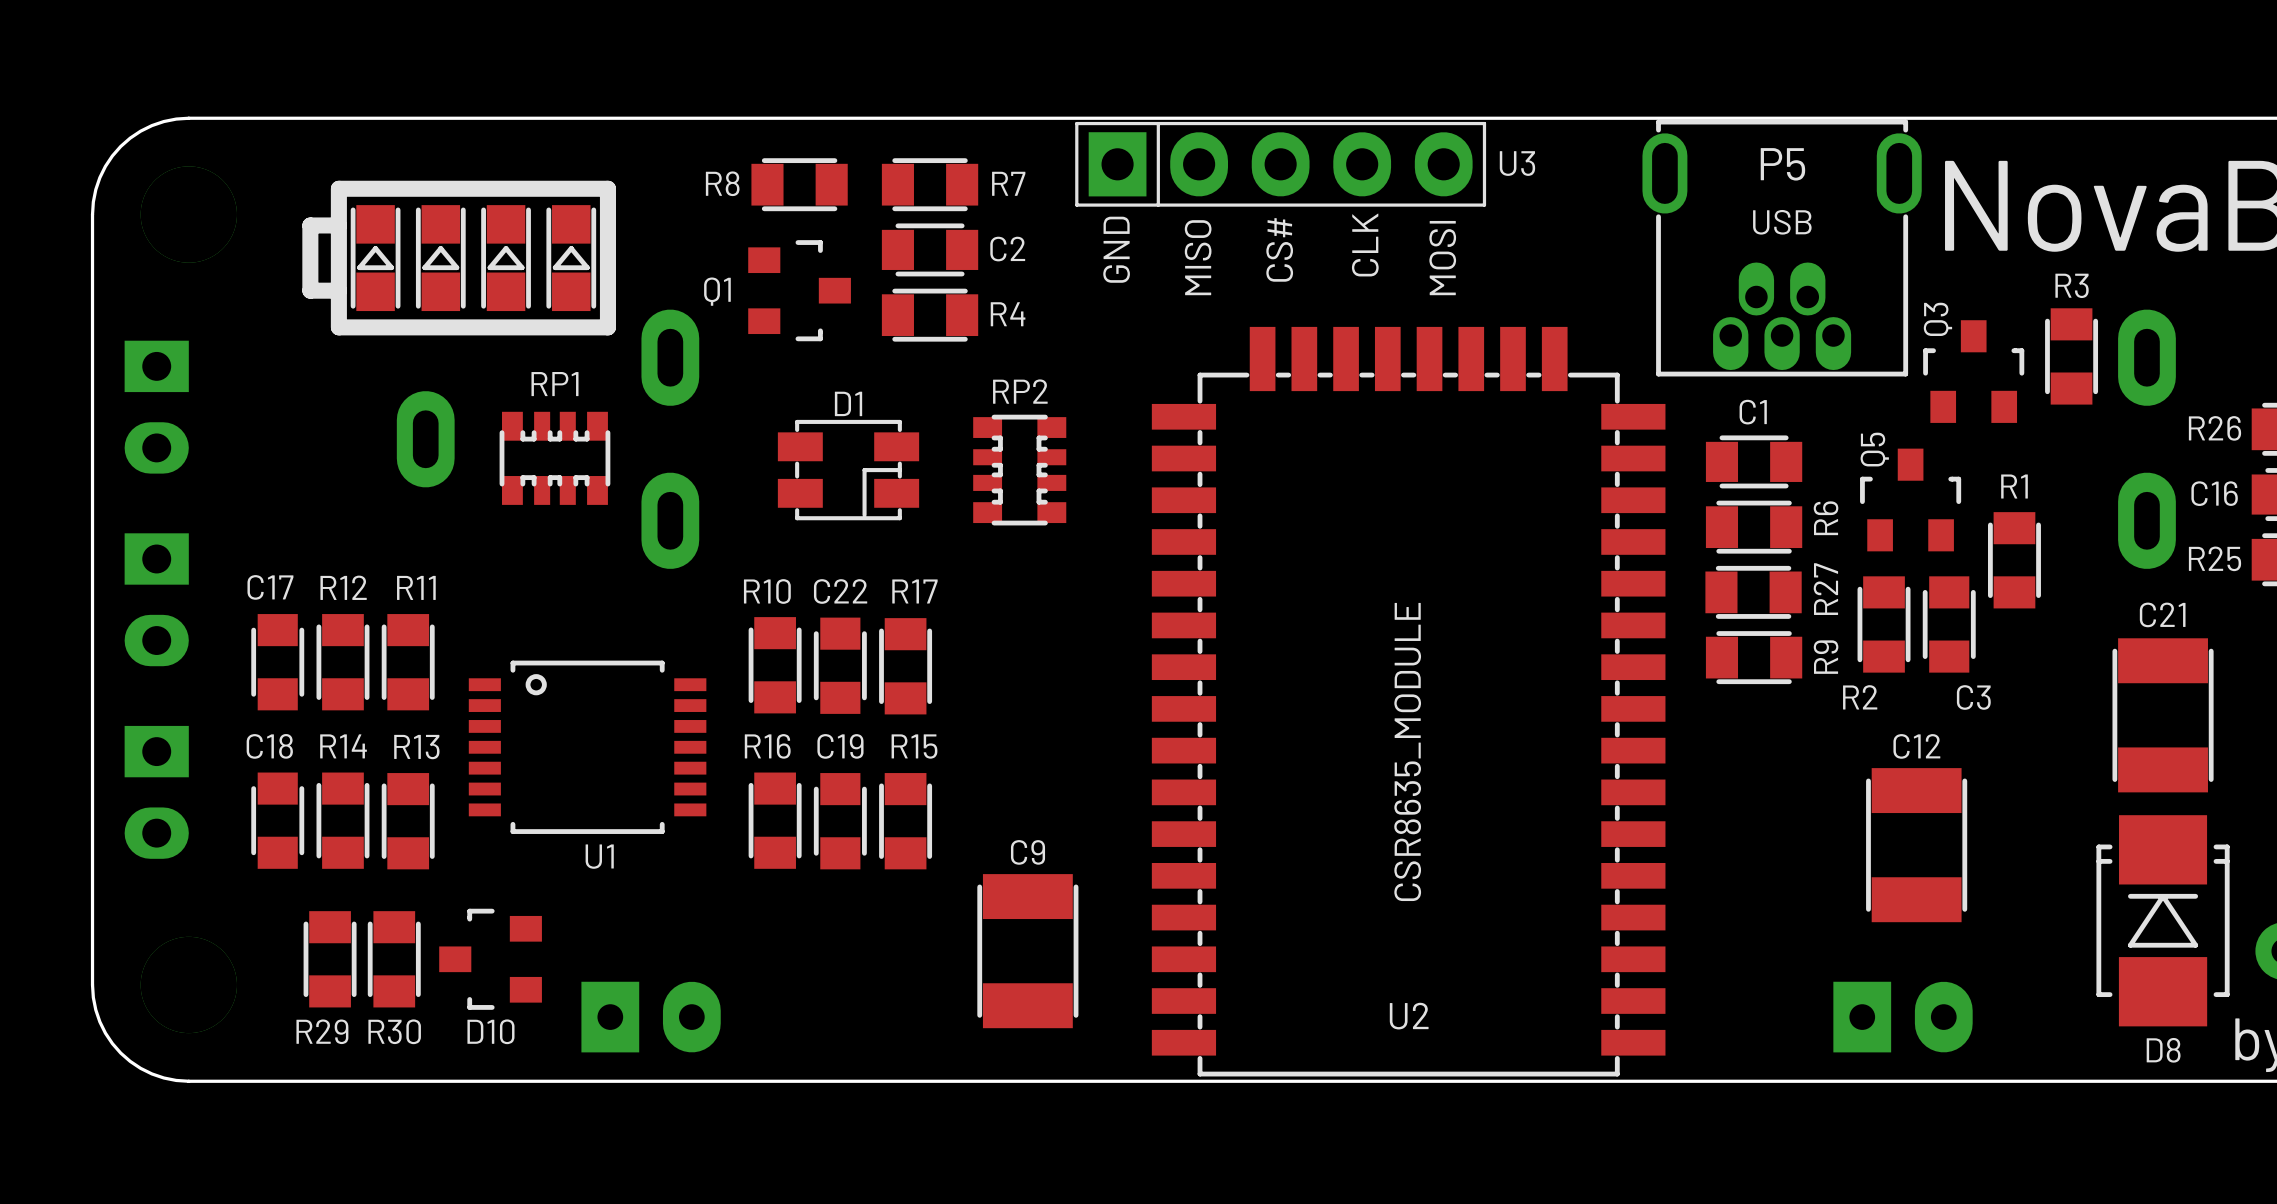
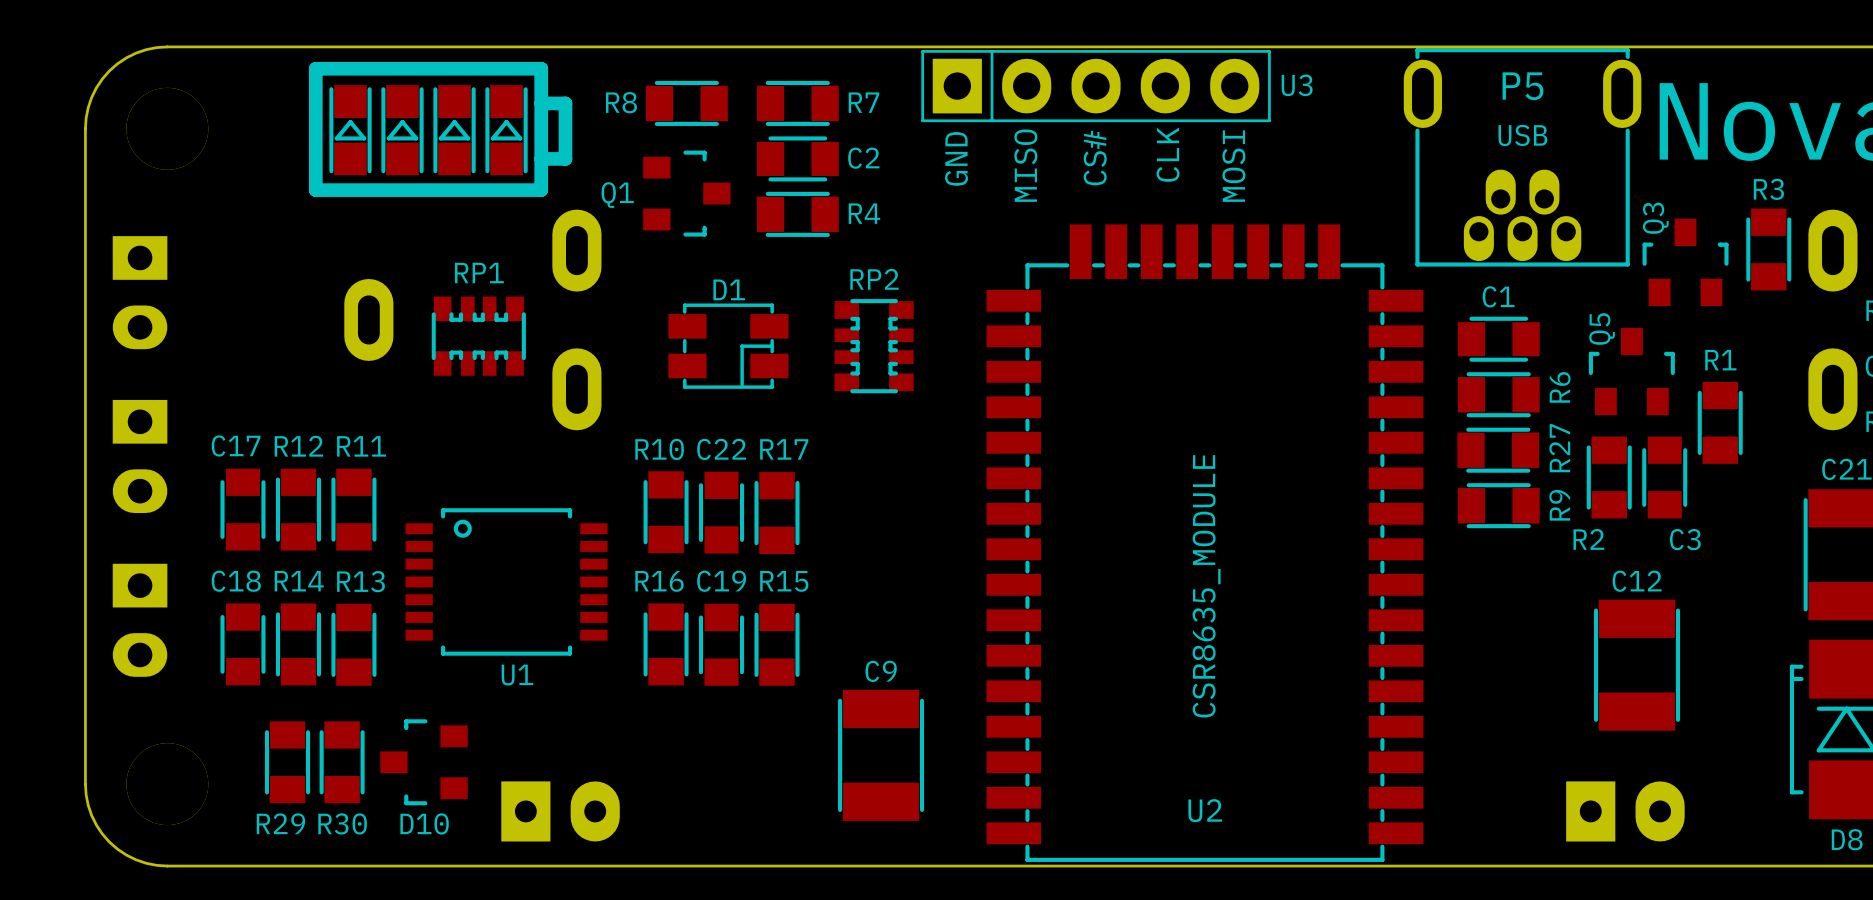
line: none -> (541, 103) (565, 103) (565, 158) (541, 158)
line: (338, 188) (338, 327) (607, 327) (607, 188) (338, 188) -> (315, 68) (315, 190) (541, 190) (541, 68) (315, 68)
part: none -> (350, 130)
part: none -> (402, 130)
part: none -> (454, 130)
part: none -> (506, 130)
line: (338, 225) (310, 225) (310, 290) (338, 290) -> none
part: (375, 258) -> none
part: (440, 258) -> none
part: (506, 258) -> none
part: (571, 258) -> none

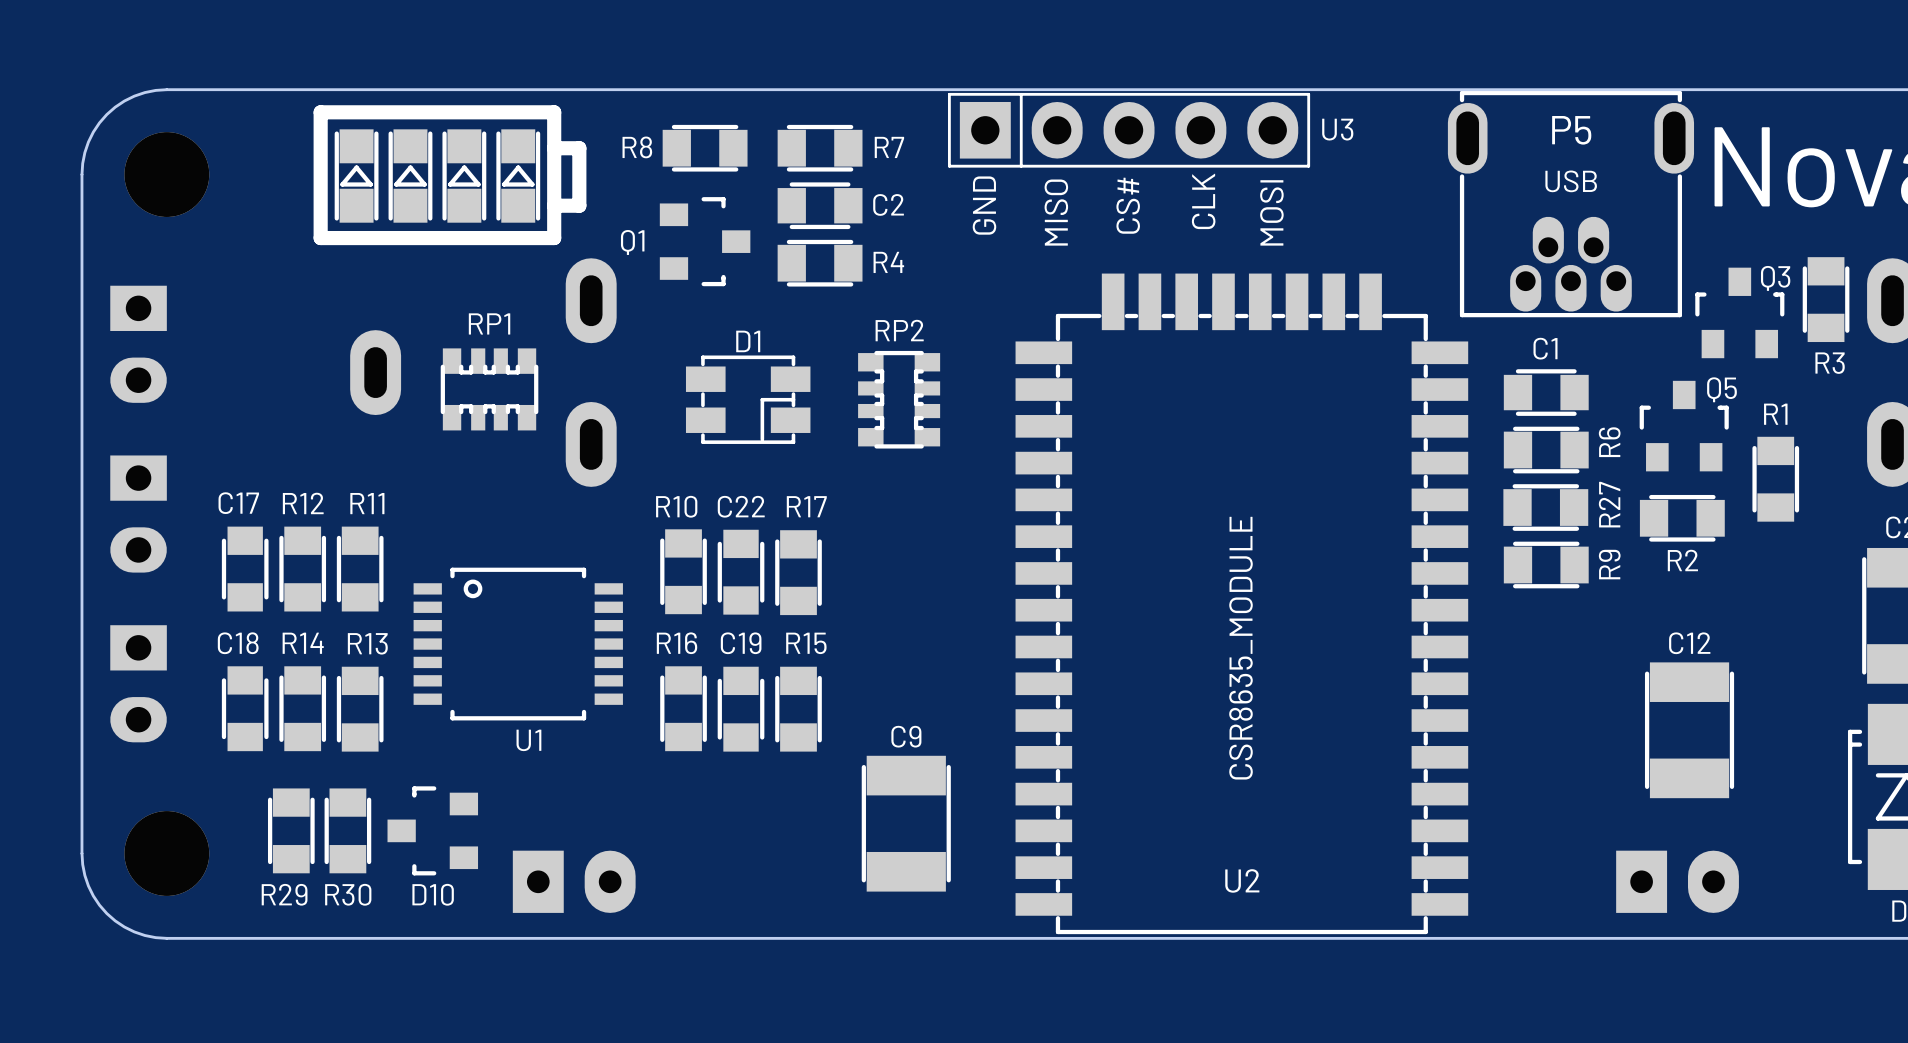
R3 name position: R3 (1768, 189) -> R3 (1830, 363)
Q3 name rotation: 0° (1655, 218) -> 90° clockwise (1775, 278)
Q3 name position: Q3 (1655, 218) -> Q3 (1775, 278)
Q5 name rotation: 0° (1602, 328) -> 90° clockwise (1721, 389)
Q5 name position: Q5 (1602, 328) -> Q5 (1721, 389)
R2 rotation: 0° (1609, 477) -> 90° clockwise (1682, 518)
C3: (1664, 477) -> none

